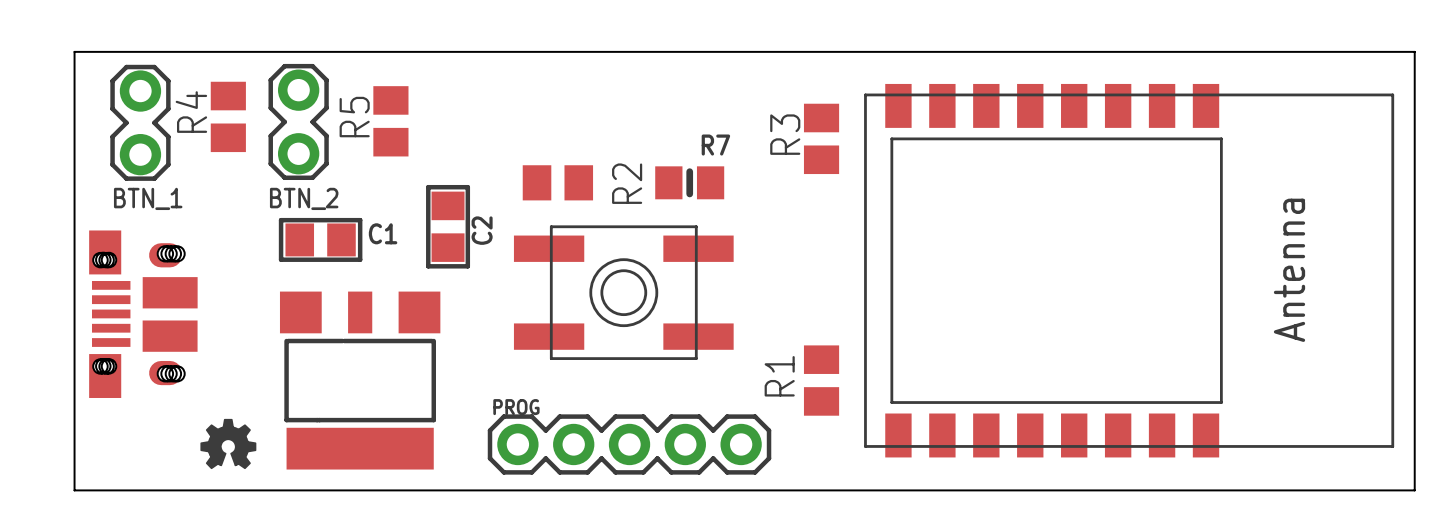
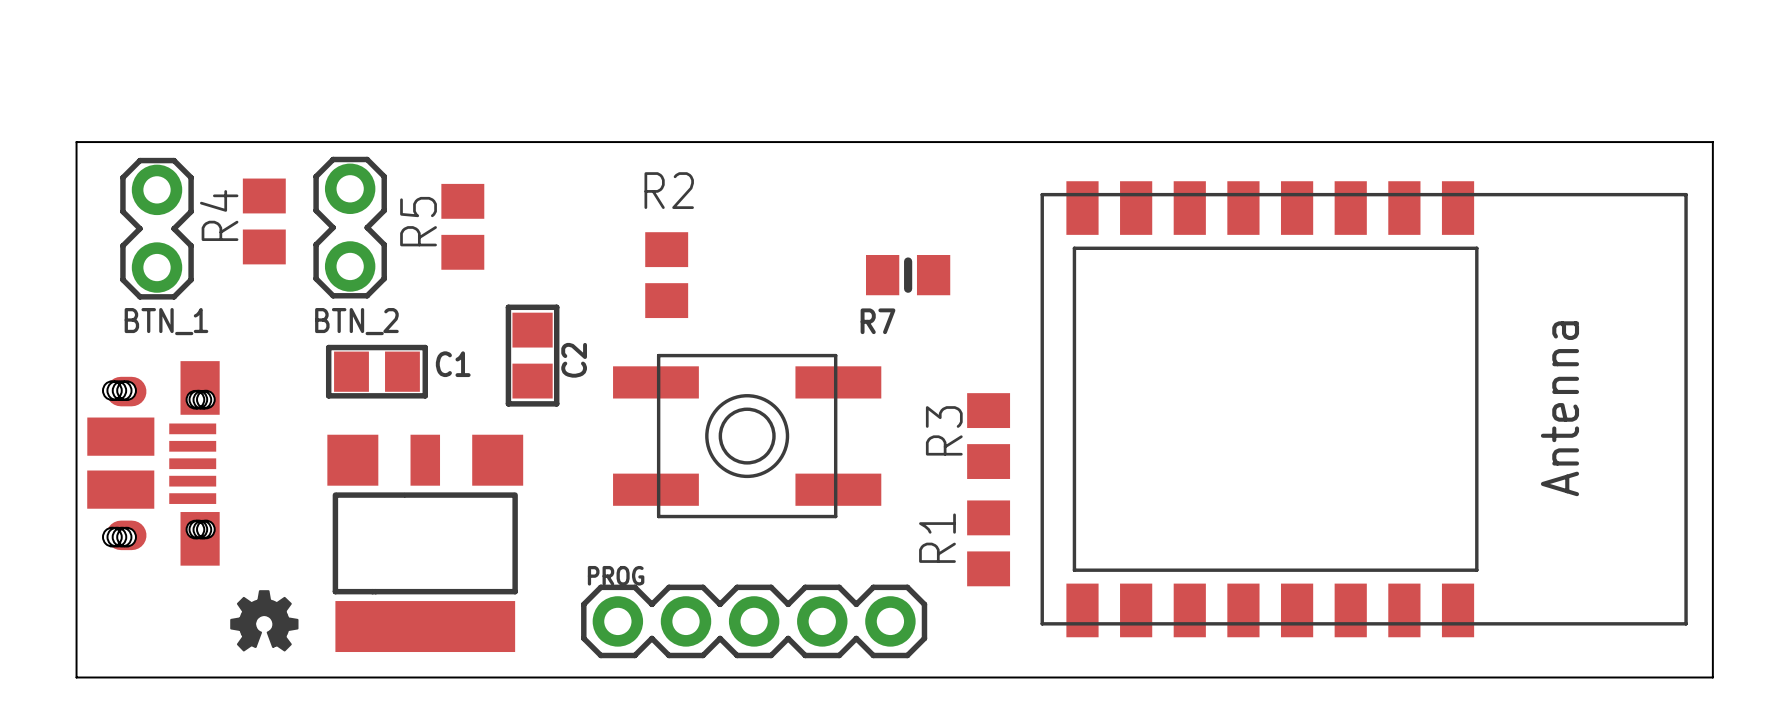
R3 position: (821, 138) -> (988, 436)
R7 name position: R7 (715, 145) -> R7 (878, 321)
R2 rotation: 0° (557, 182) -> 90° clockwise (666, 275)
R7 position: (689, 182) -> (908, 275)
R2 name position: R2 (627, 183) -> R2 (669, 190)
part rotation: 0° (143, 314) -> 180° (153, 463)

